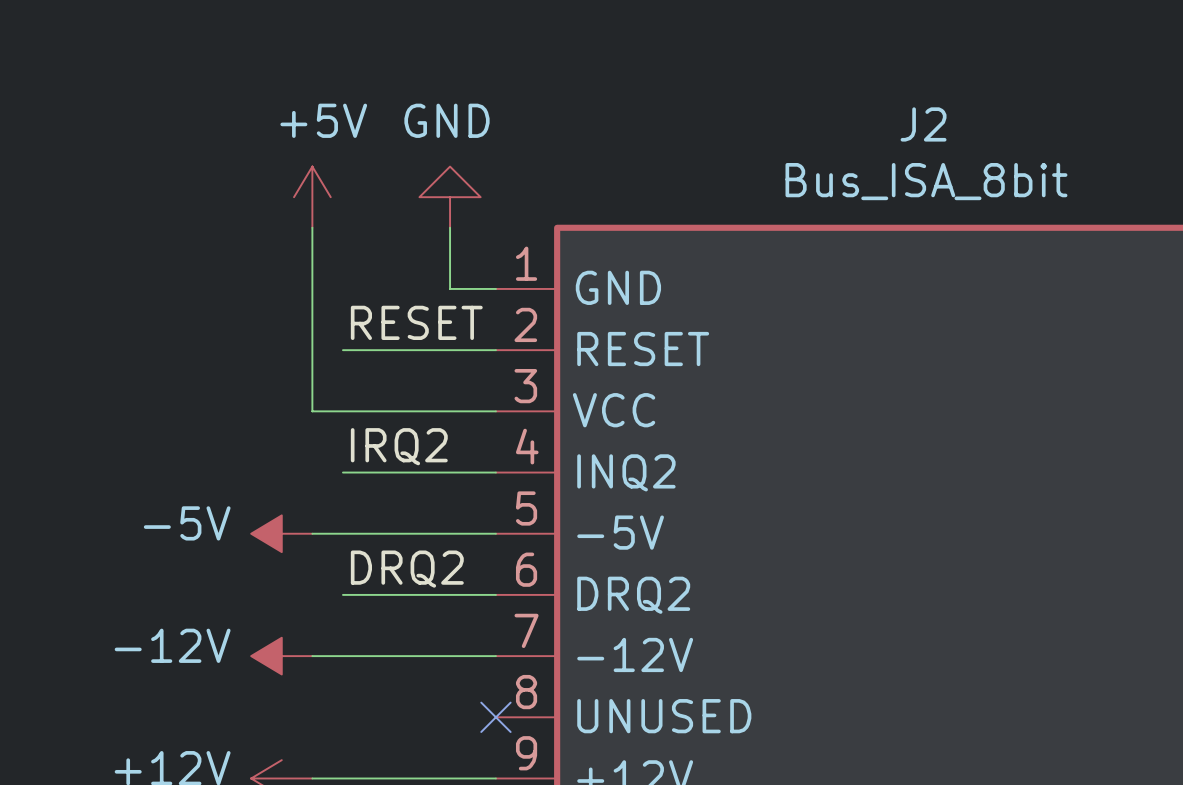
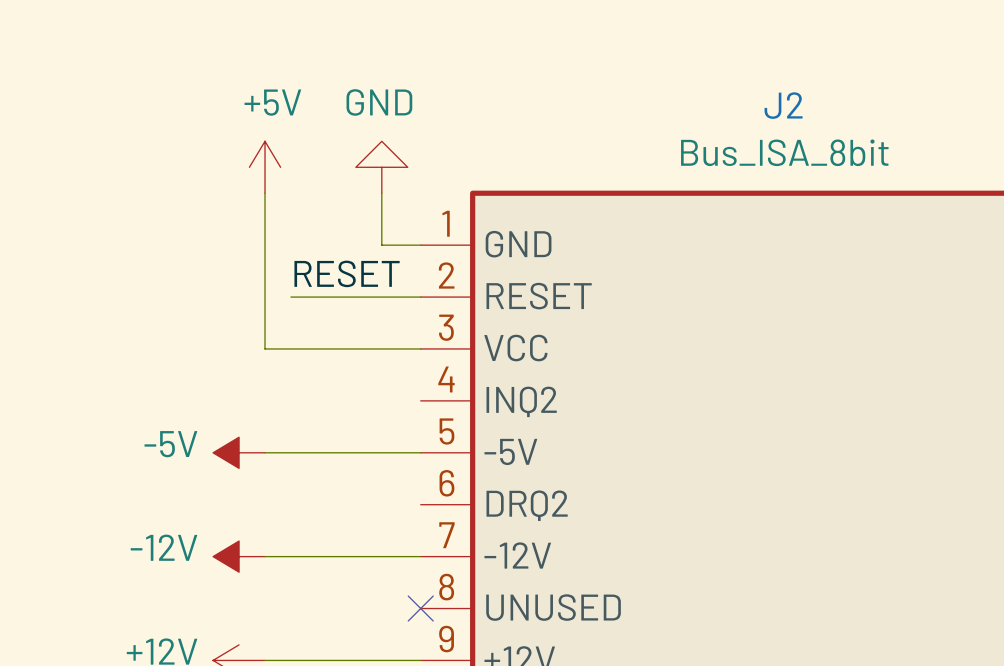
label: IRQ2 (399, 446) -> none
wire: (342, 472) (495, 472) -> none
label: DRQ2 (407, 569) -> none
wire: (342, 594) (495, 594) -> none

